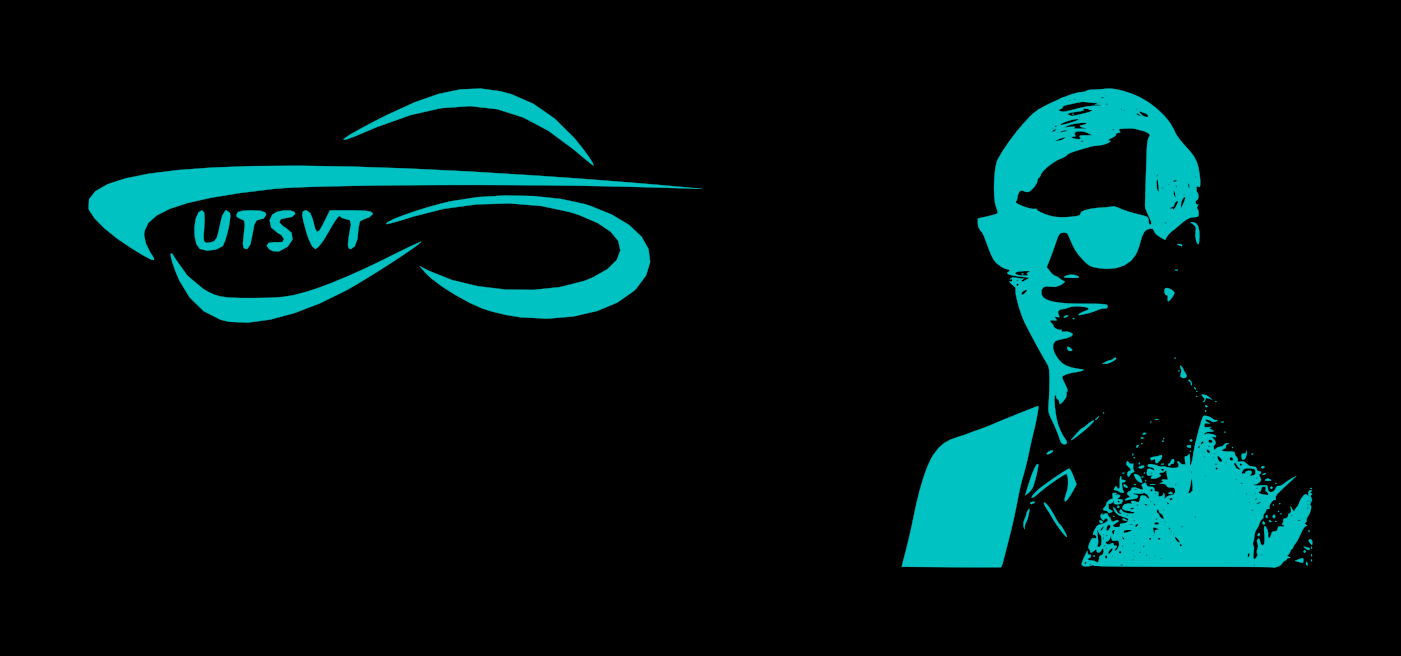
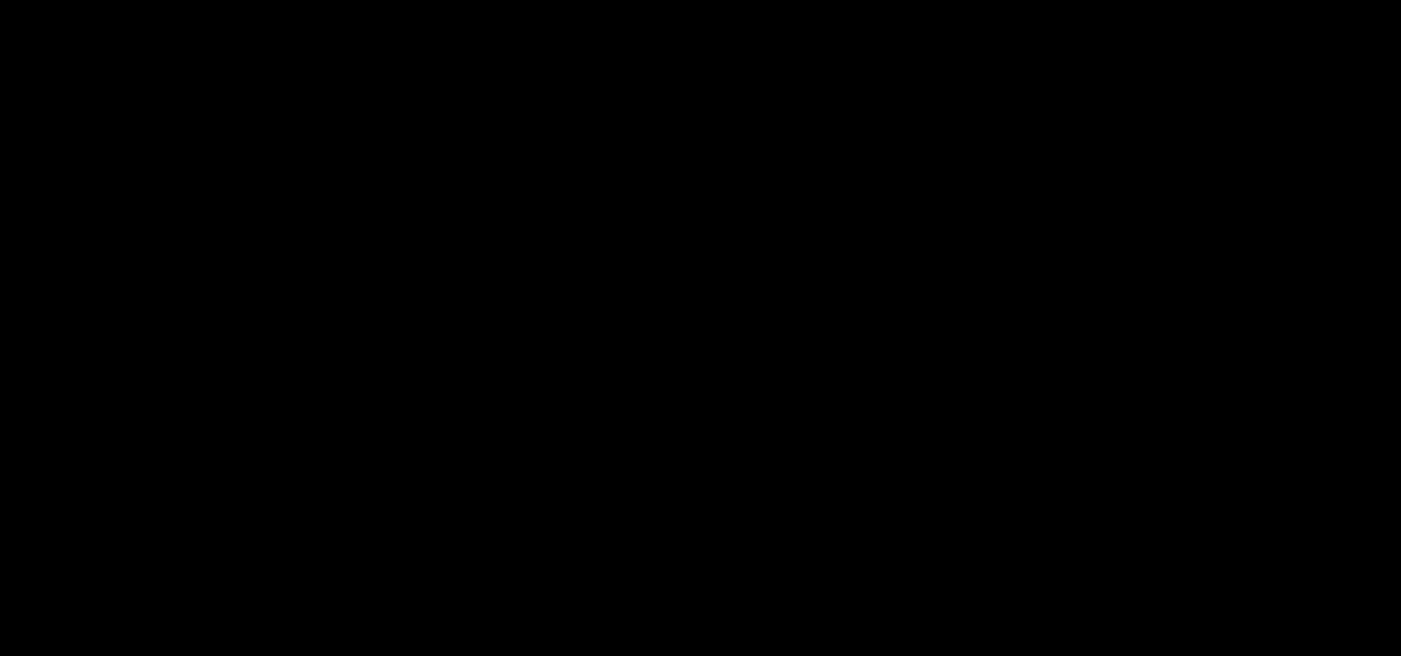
drawing: [88, 88, 703, 323] -> none
drawing: [901, 88, 1313, 568] -> none

